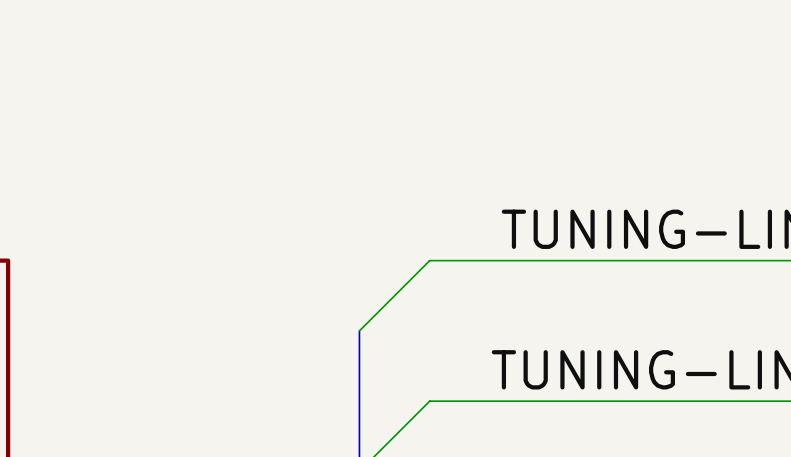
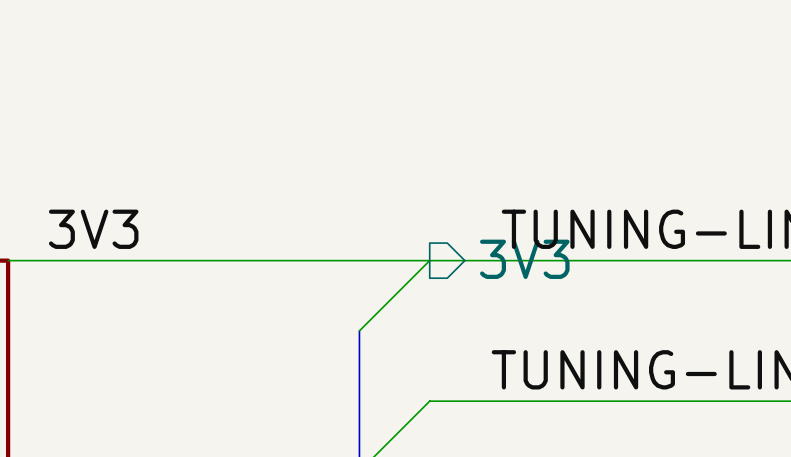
label: none -> 3V3 (93, 229)
sheet pin: none -> 3V3 (524, 259)
wire: none -> (8, 260) (429, 260)

